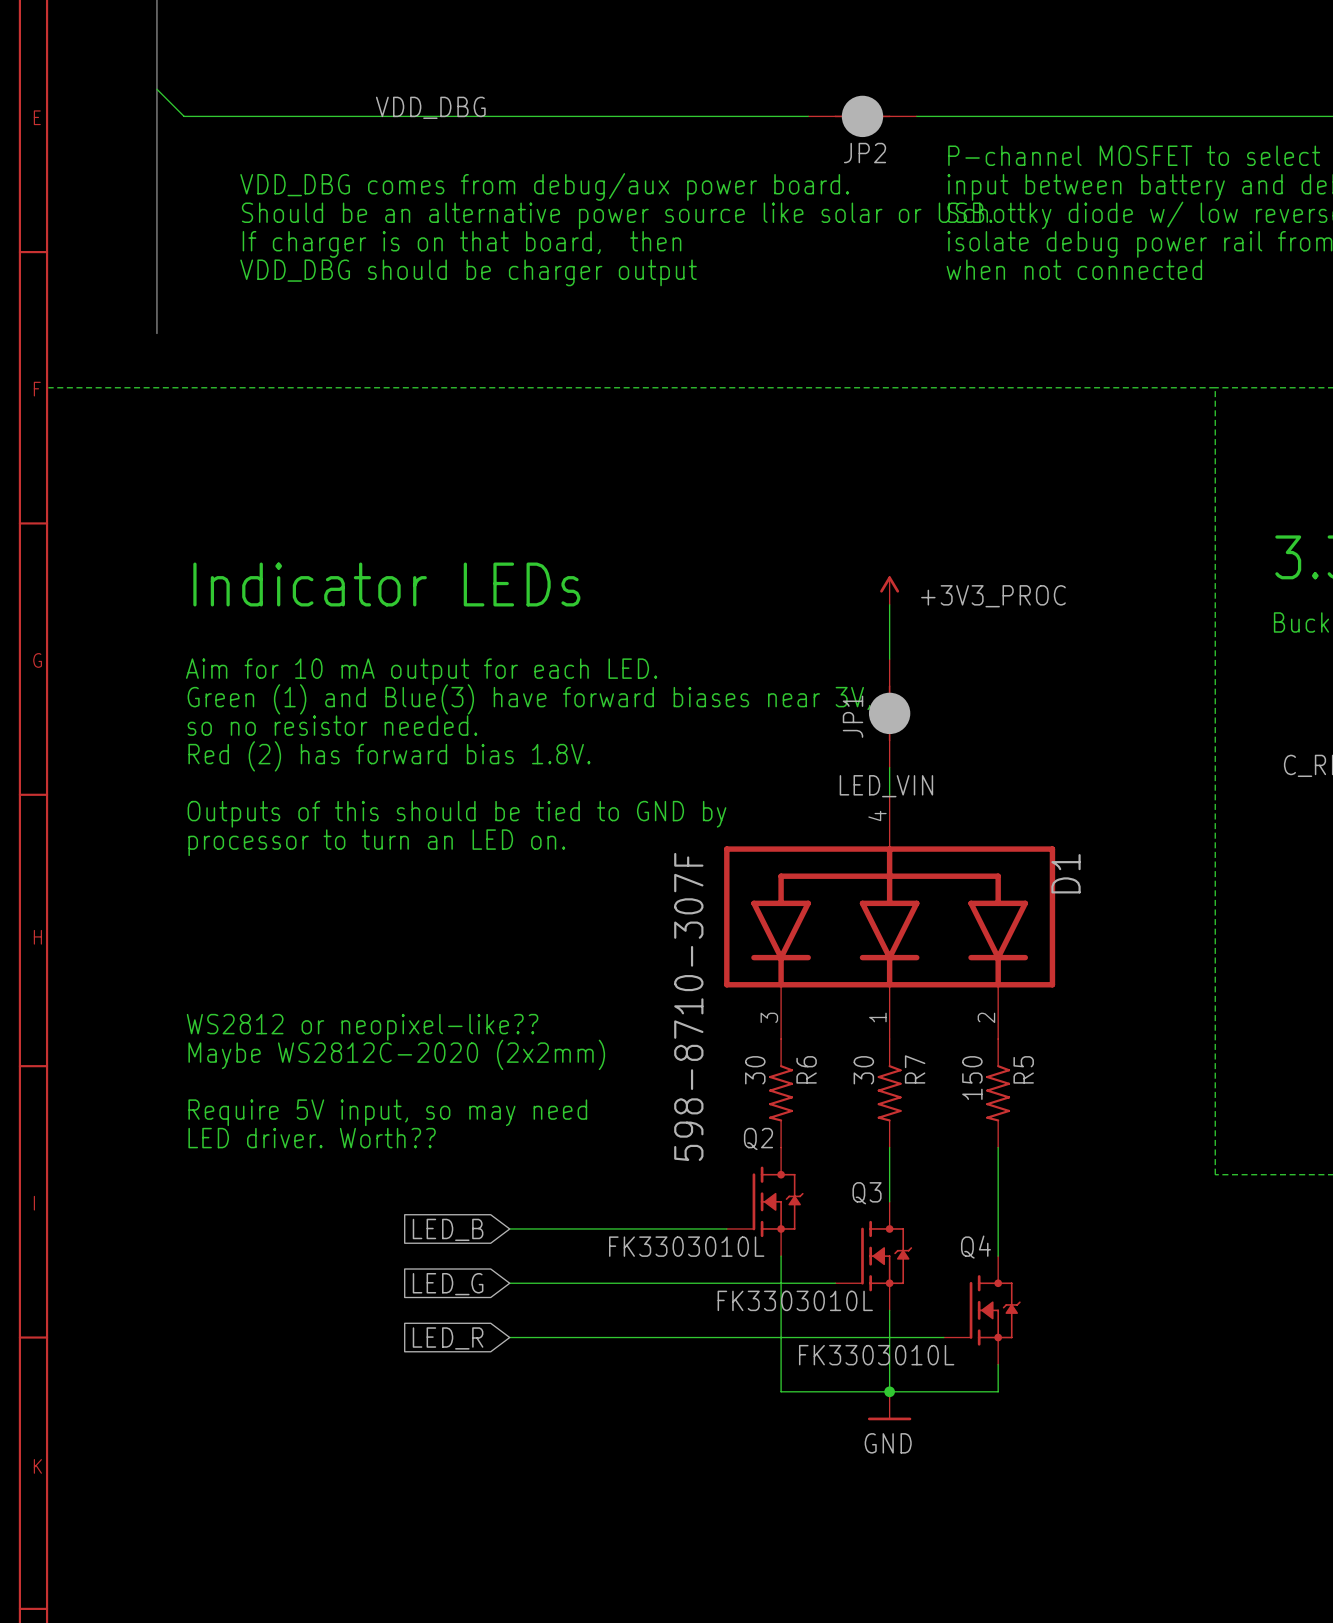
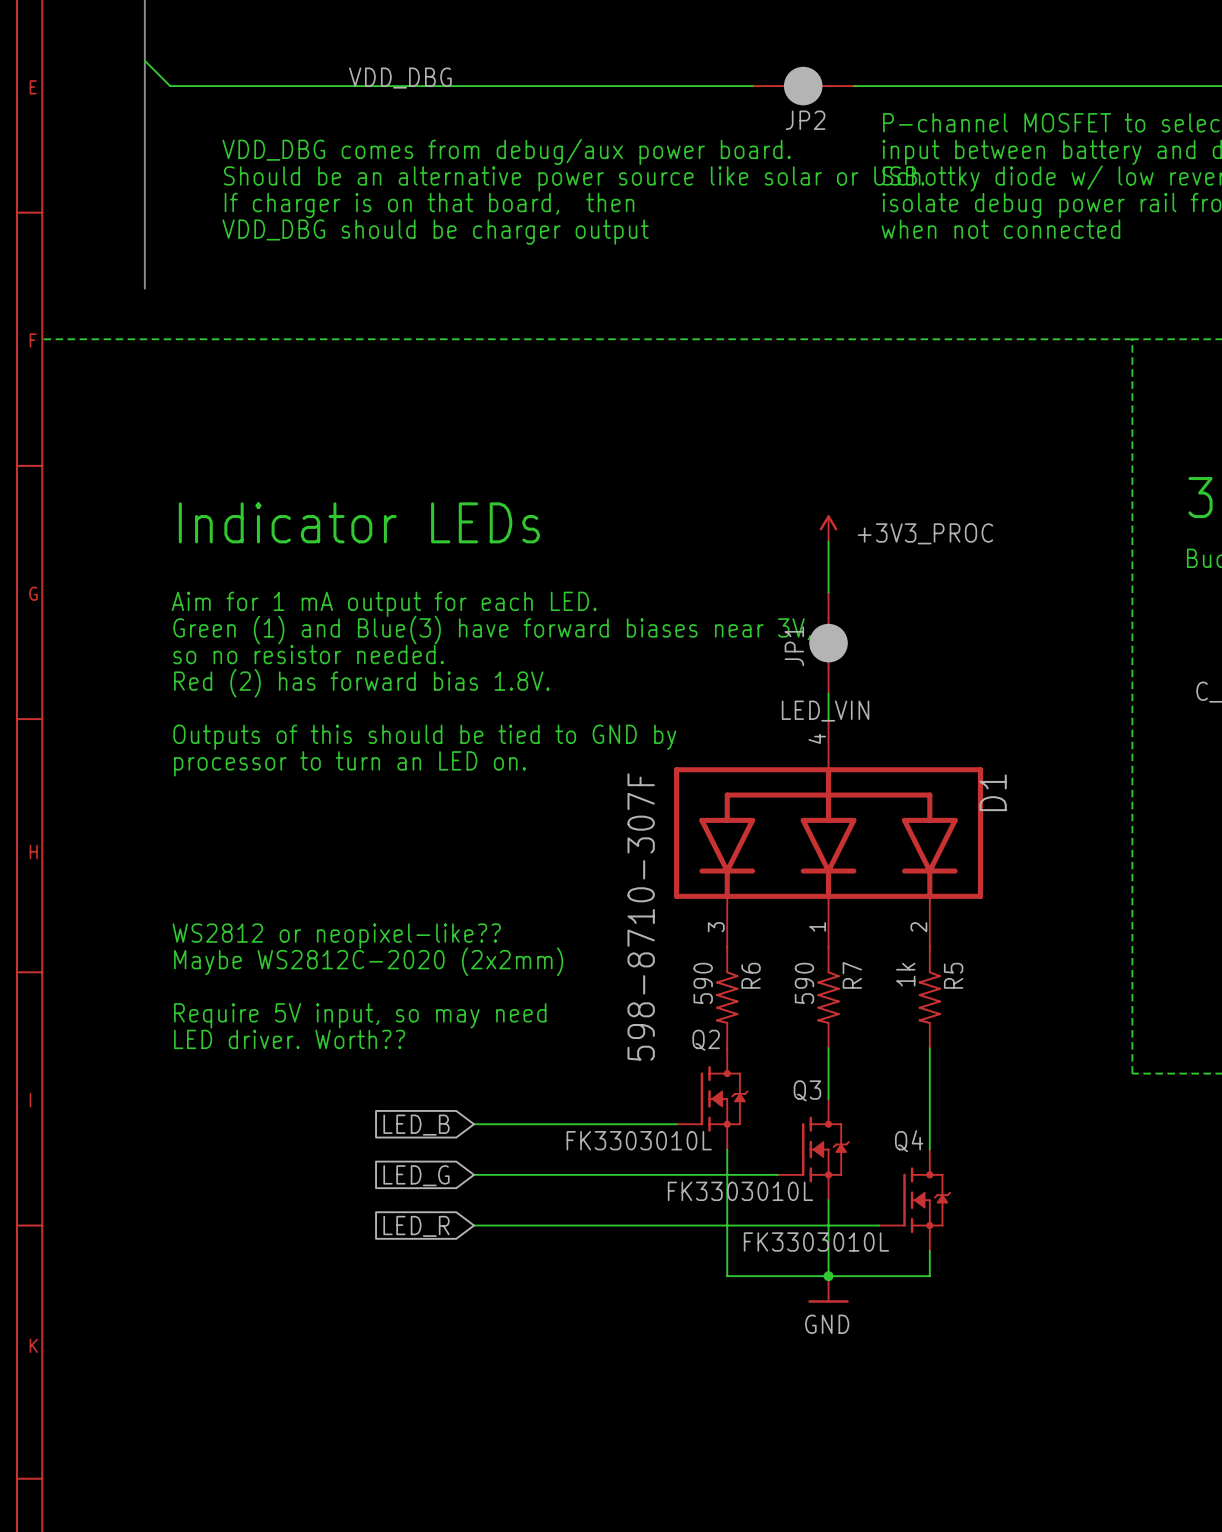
text: Aim for 10 mA output for each LED. (421, 671) -> Aim for 1 mA output for each LED. (384, 604)
R6 value: 30 (755, 1070) -> 590 (703, 983)
R7 value: 30 (863, 1070) -> 590 (804, 983)
R5 value: 150 (972, 1078) -> 1k (905, 974)

